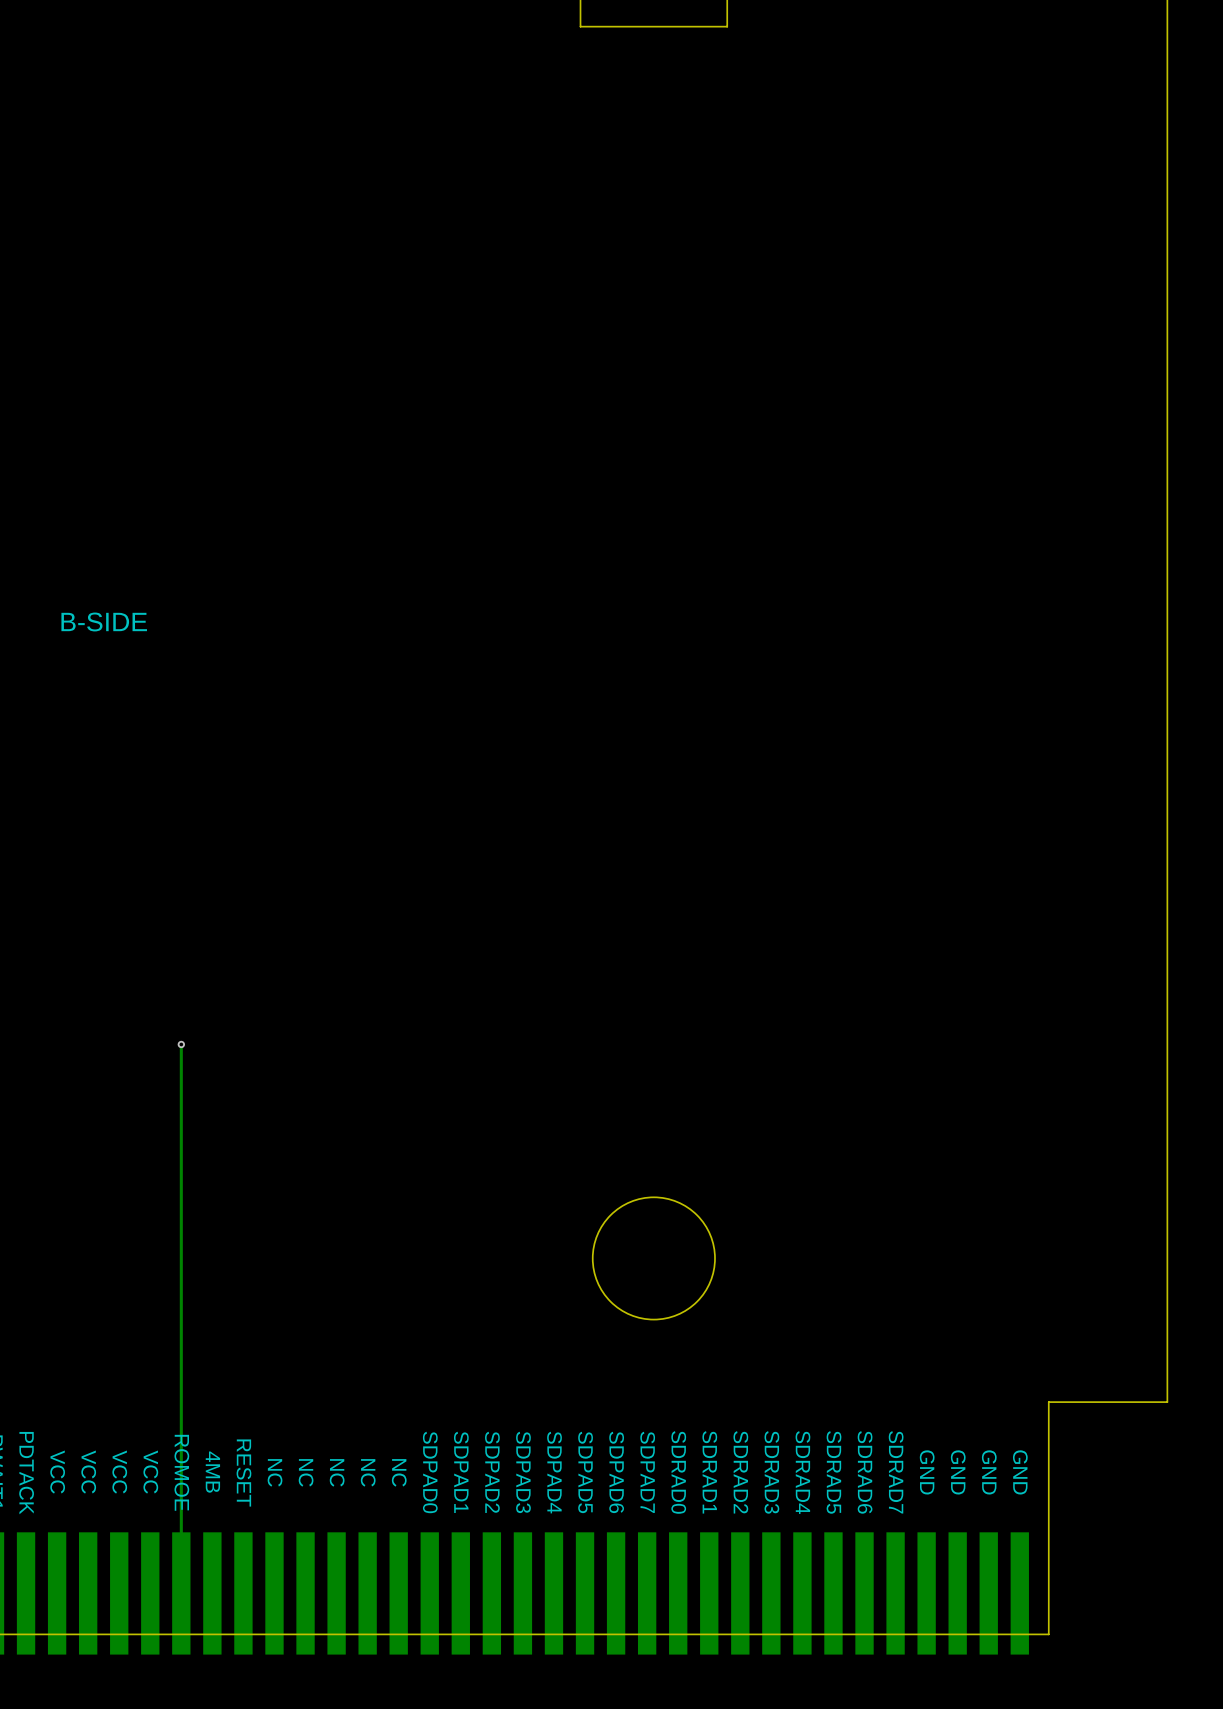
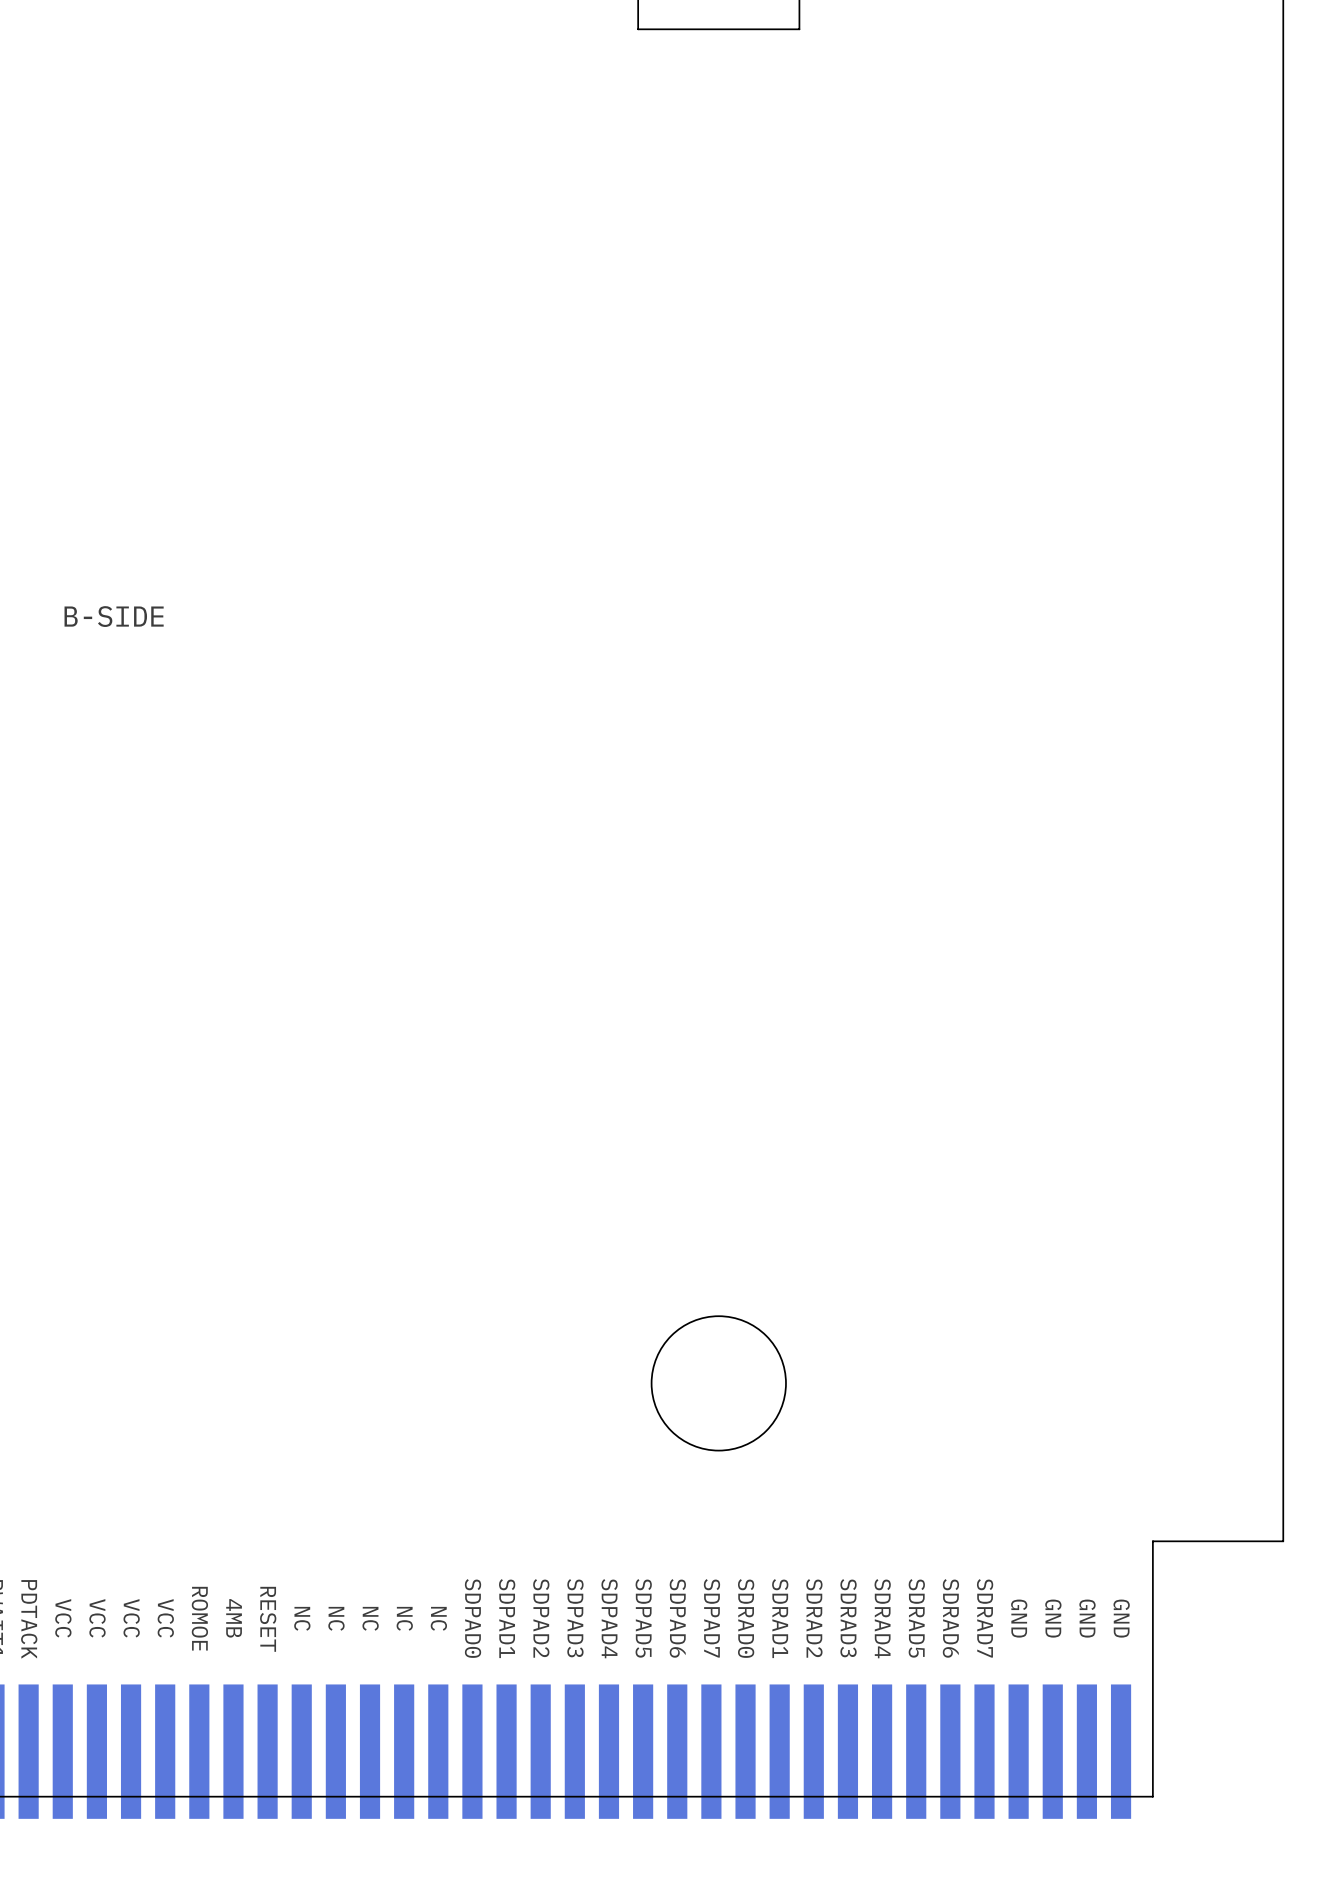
text position: B-SIDE (104, 621) -> B-SIDE (114, 616)
track: (181, 1044) (181, 1593) -> none
via: (181, 1044) -> none

